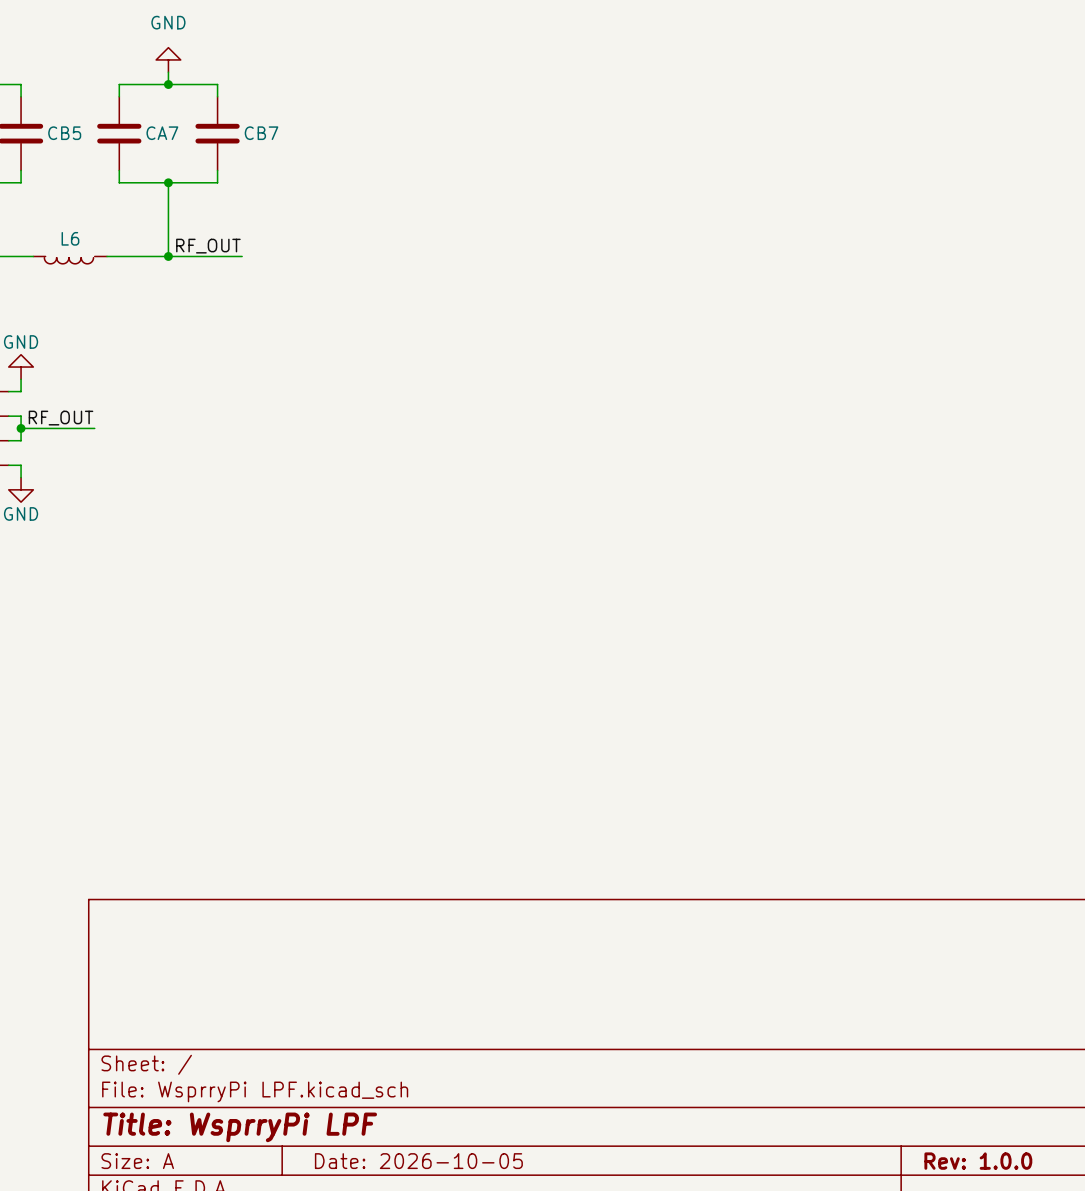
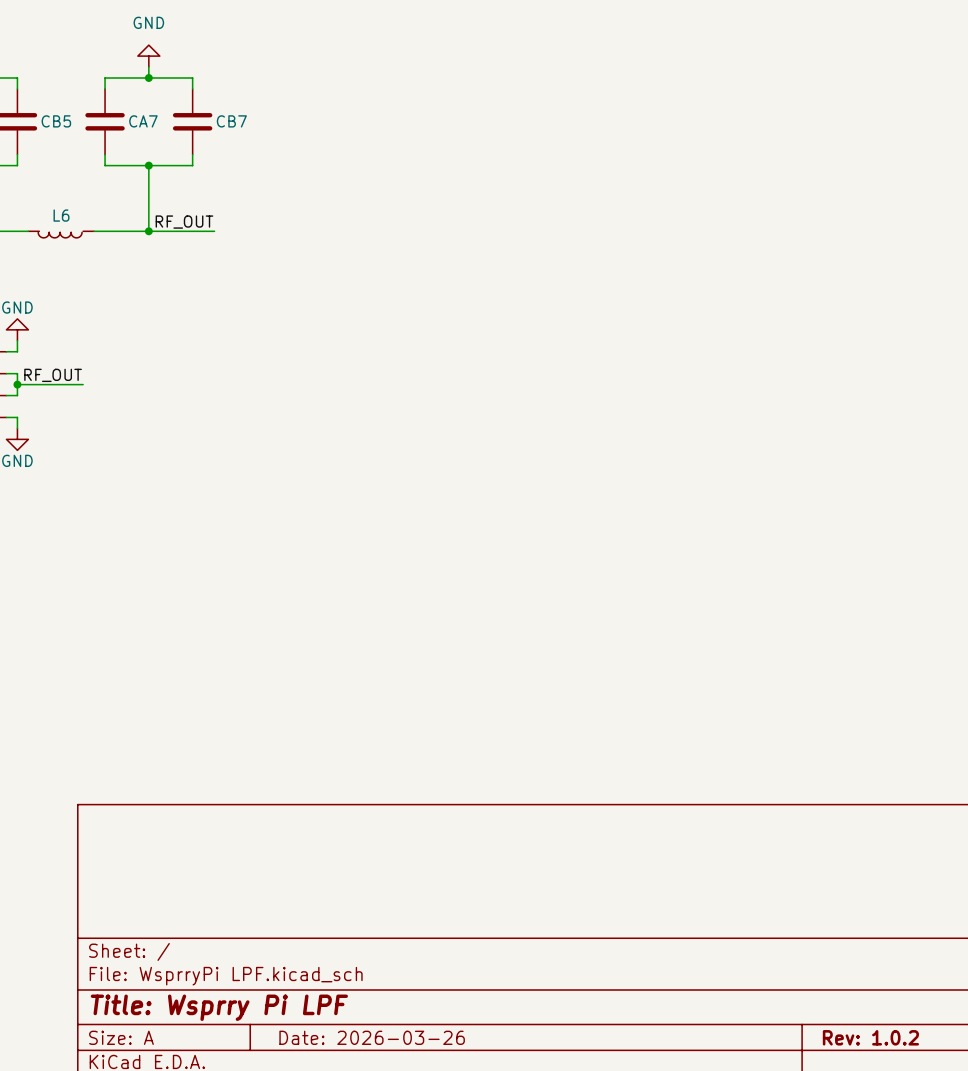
title block: Title: WsprryPi LPF (240, 1127) -> Title: Wsprry Pi LPF (219, 1007)
title block: Date: 2026-10-05 (418, 1161) -> Date: 2026-03-26 (372, 1037)
title block: Rev: 1.0.0 (978, 1161) -> Rev: 1.0.2 (870, 1037)

